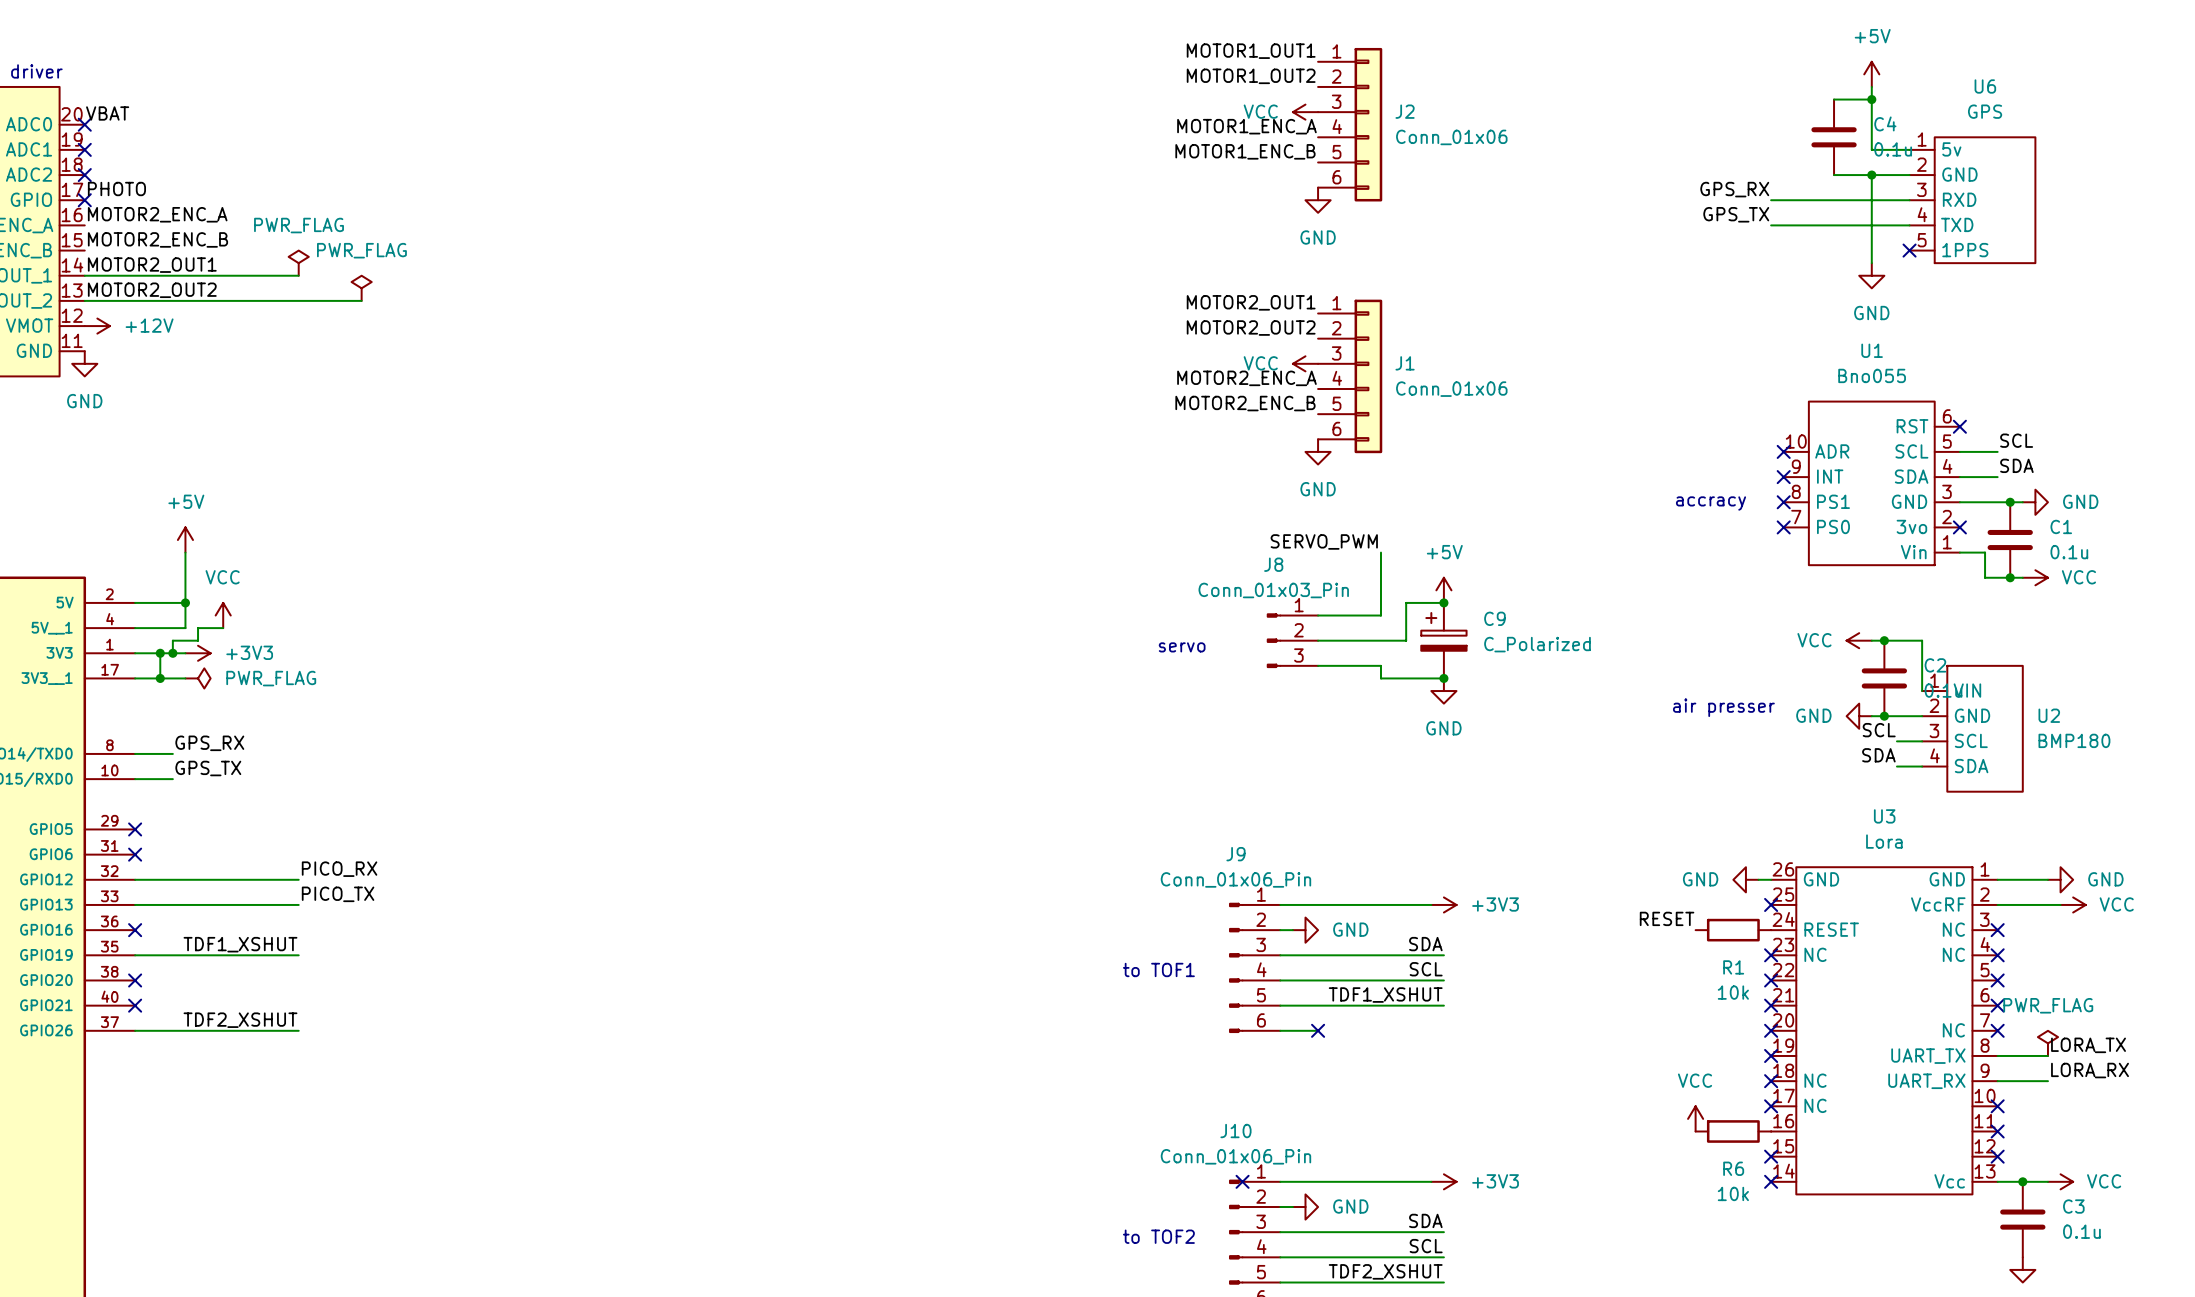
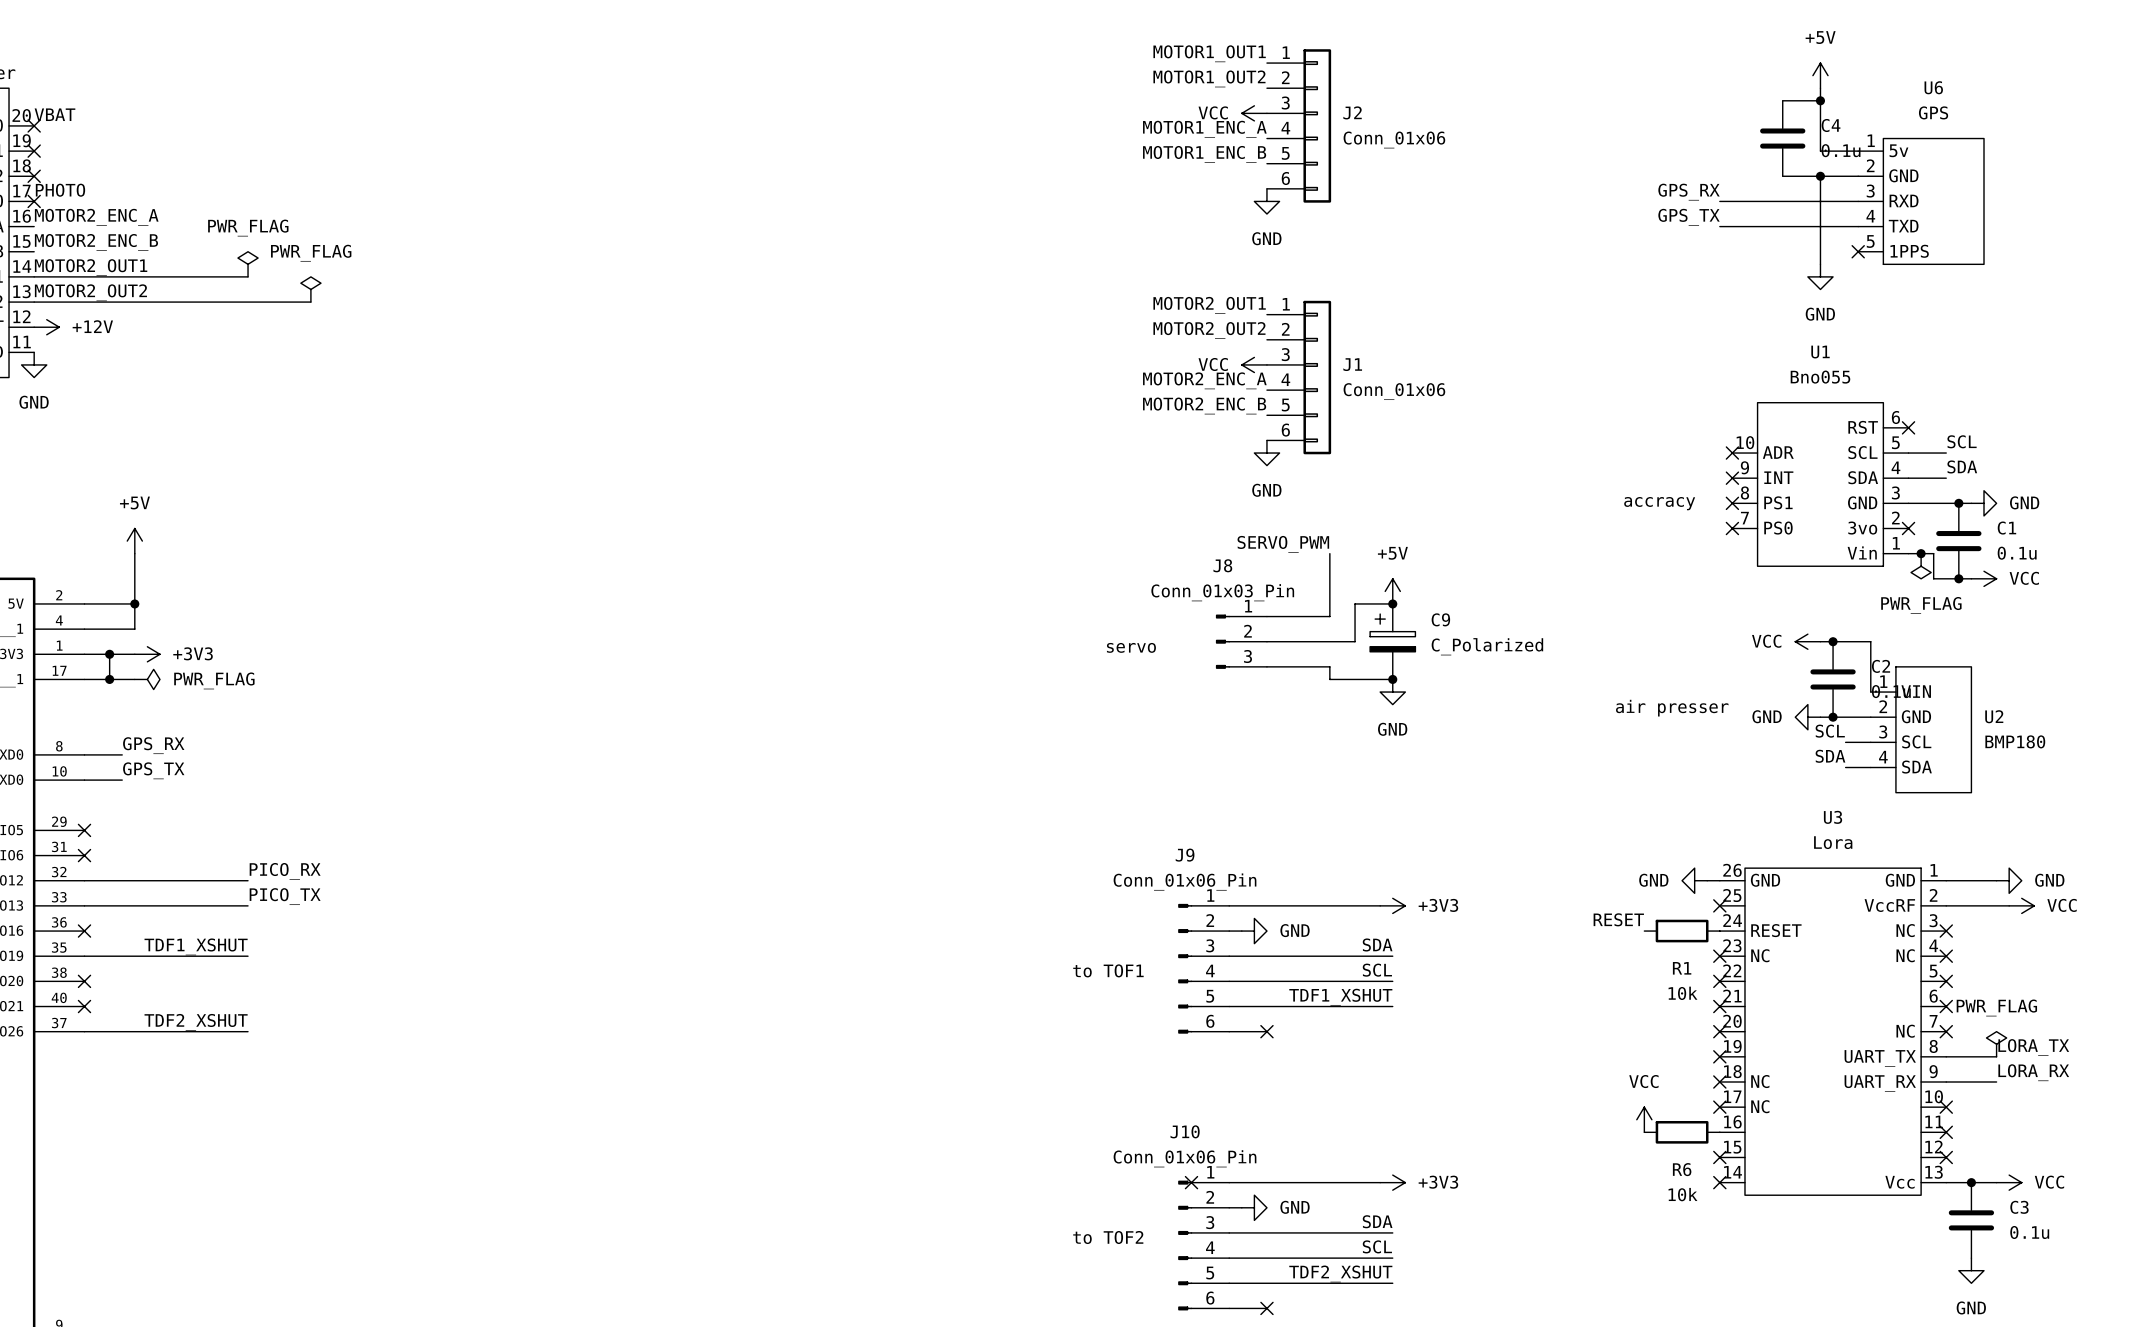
junction: none -> (1921, 553)
power symbol: none -> PWR_FLAG (1921, 566)
power symbol: VCC (223, 615) -> none
wire: (223, 628) (198, 628) (198, 640) (172, 640) (172, 653) -> none
junction: (172, 653) -> none

